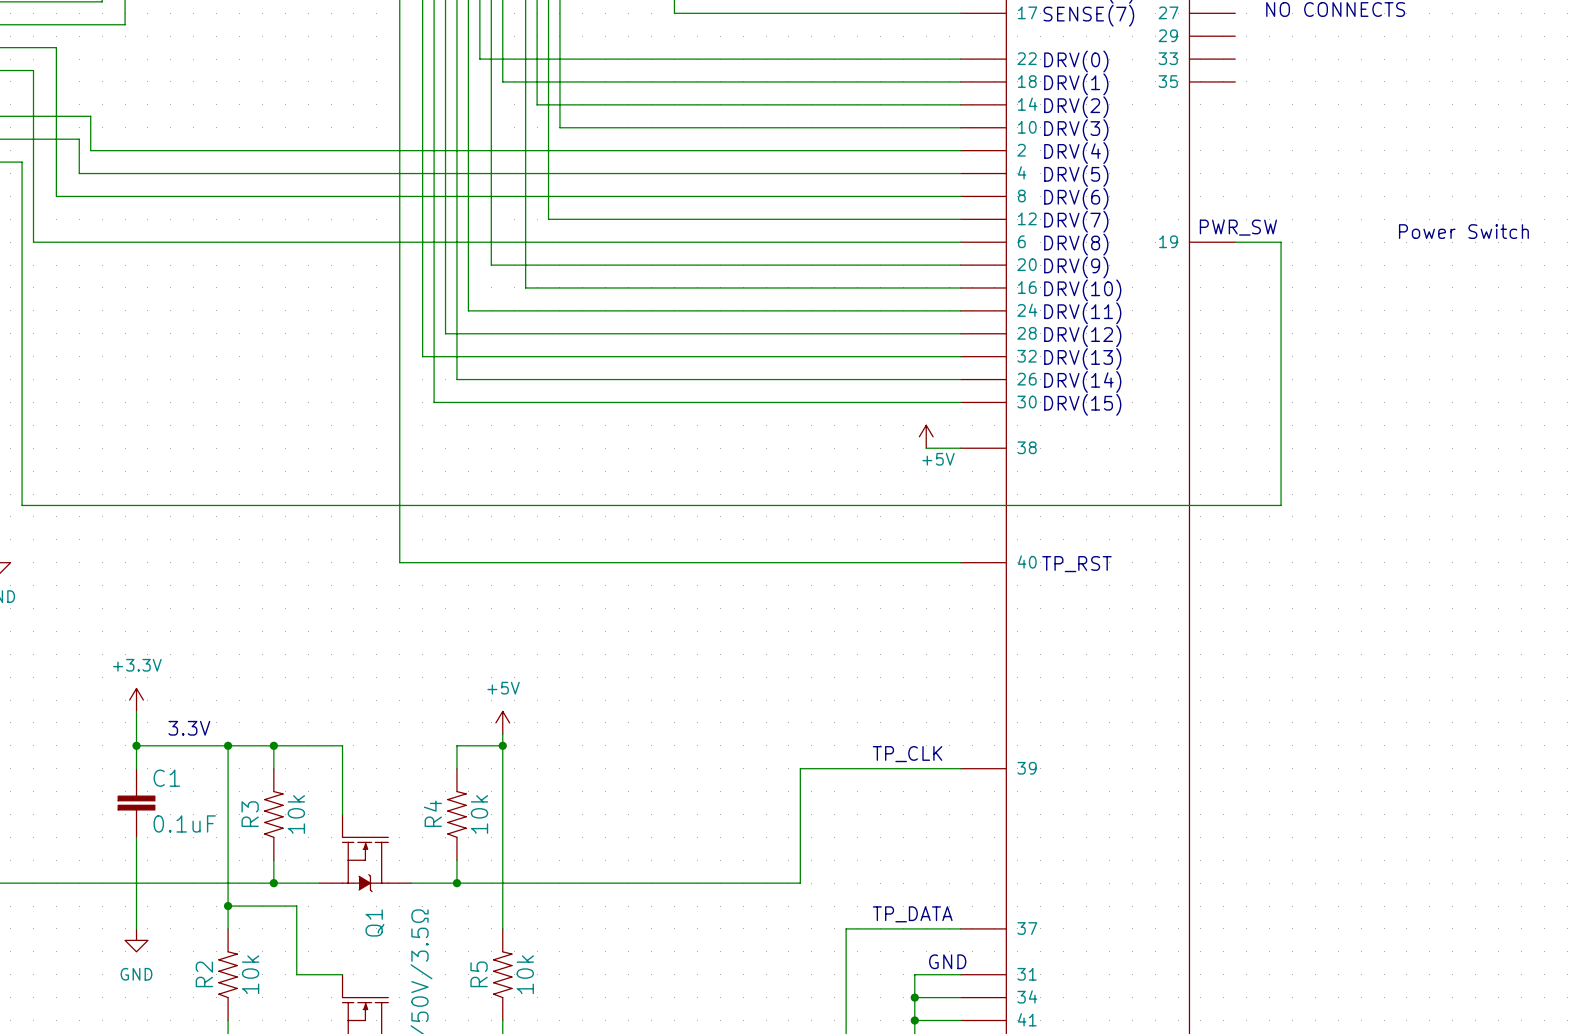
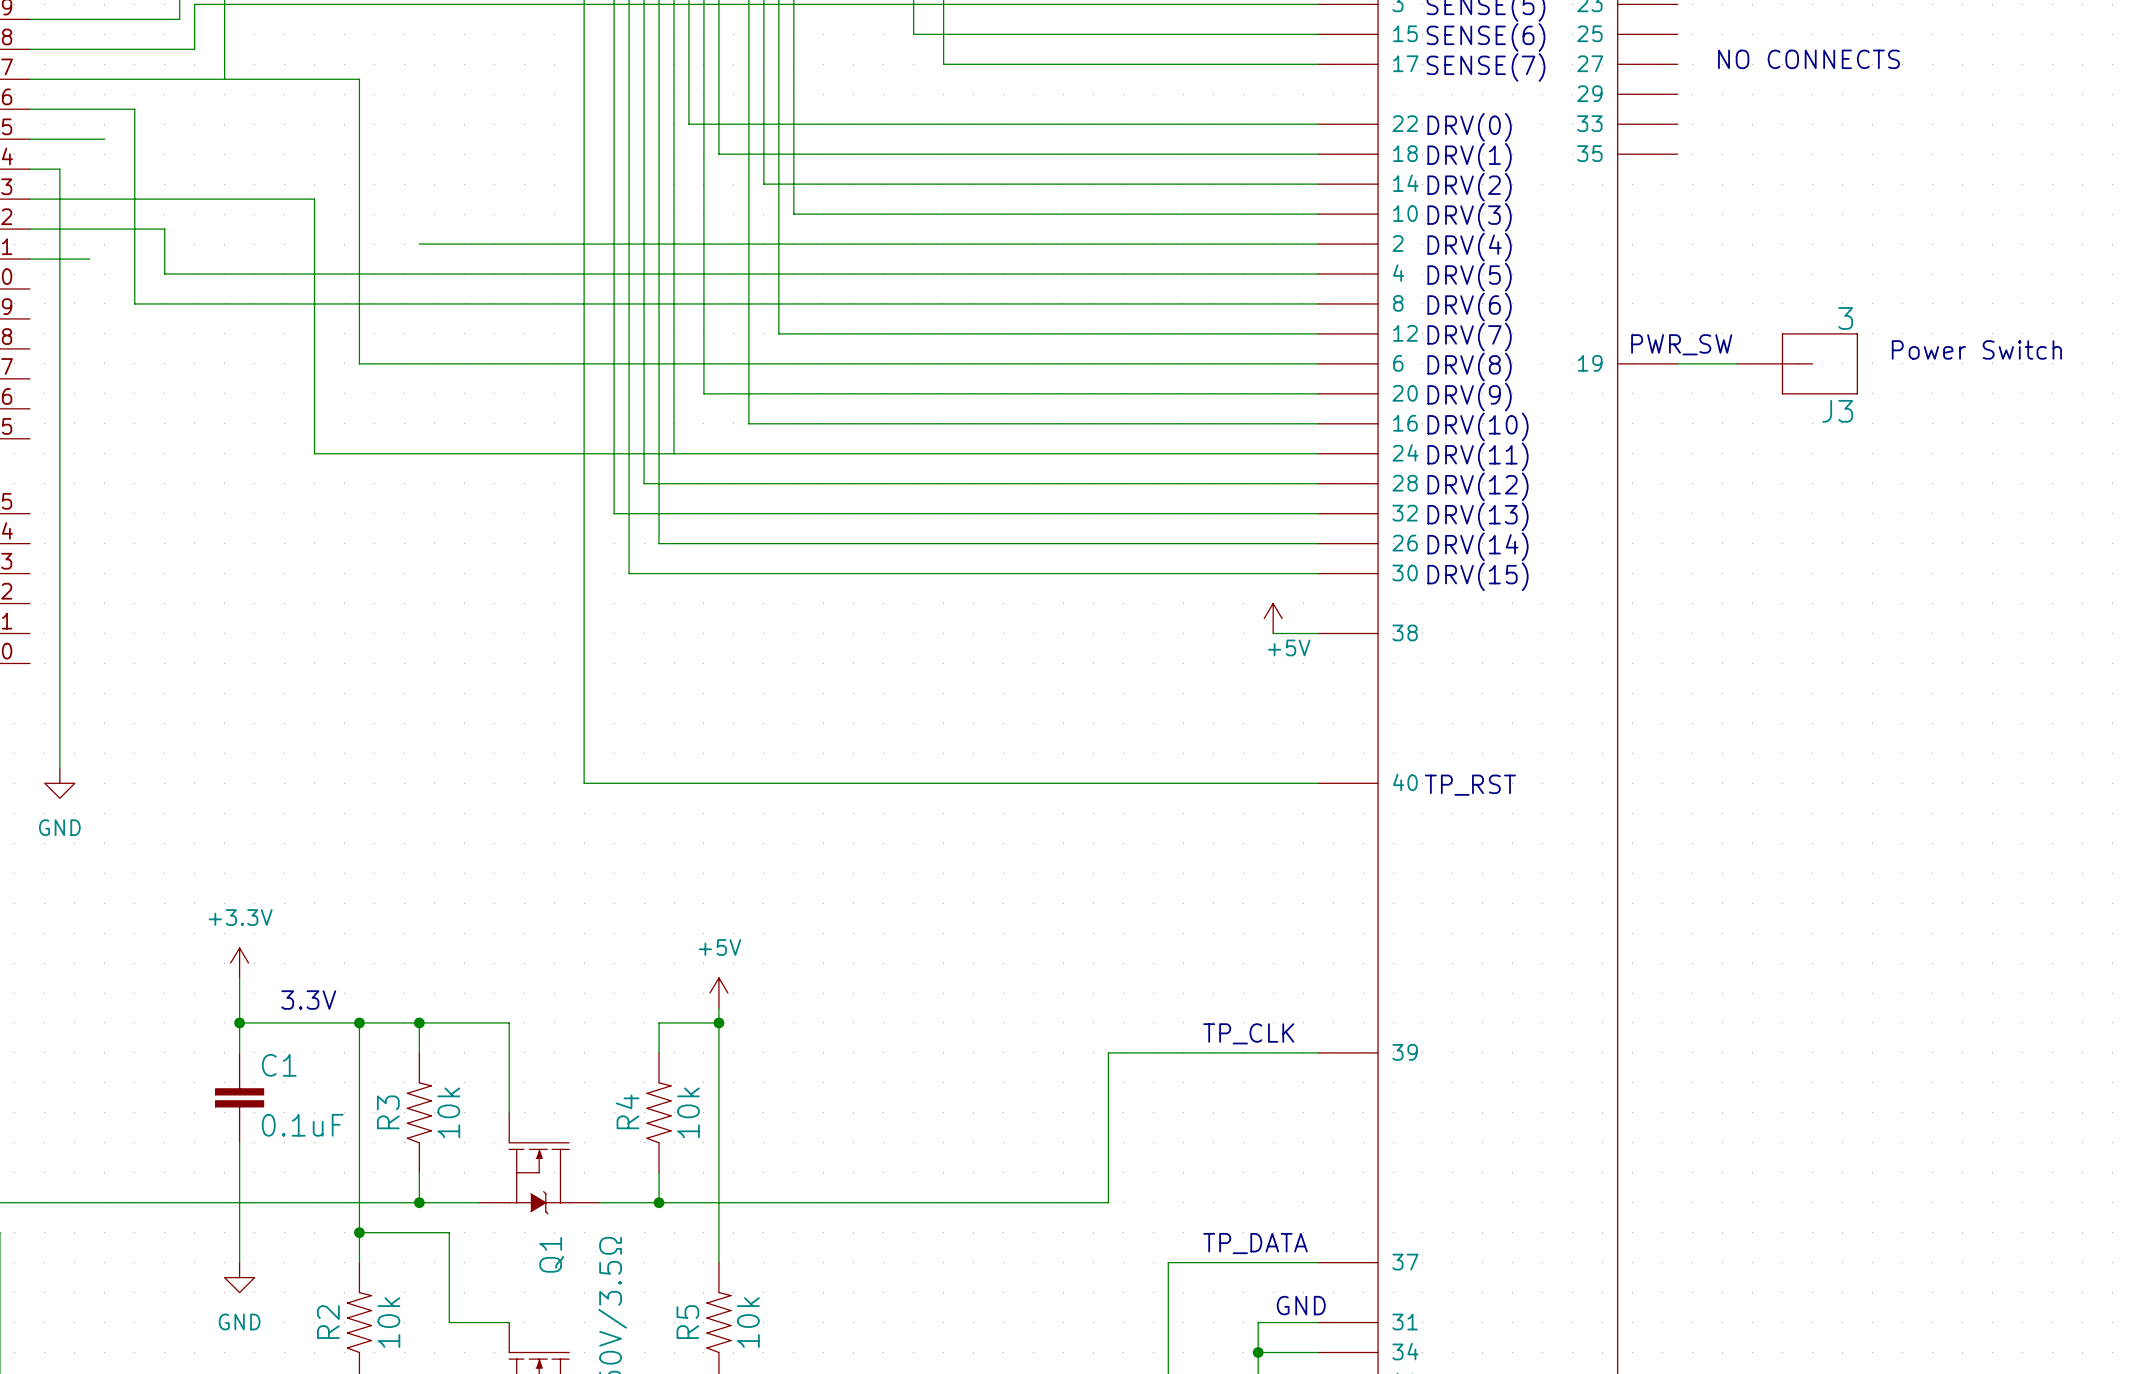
wire: (33, 70) (33, 242) (228, 242) -> (224, 79) (359, 79) (359, 363)
wire: (90, 116) (90, 150) (273, 150) -> (179, 199) (314, 199) (314, 453) (674, 453)
wire: (22, 162) (22, 505) (1281, 505) (1281, 242) -> none
J3: none -> 3 (1797, 363)

